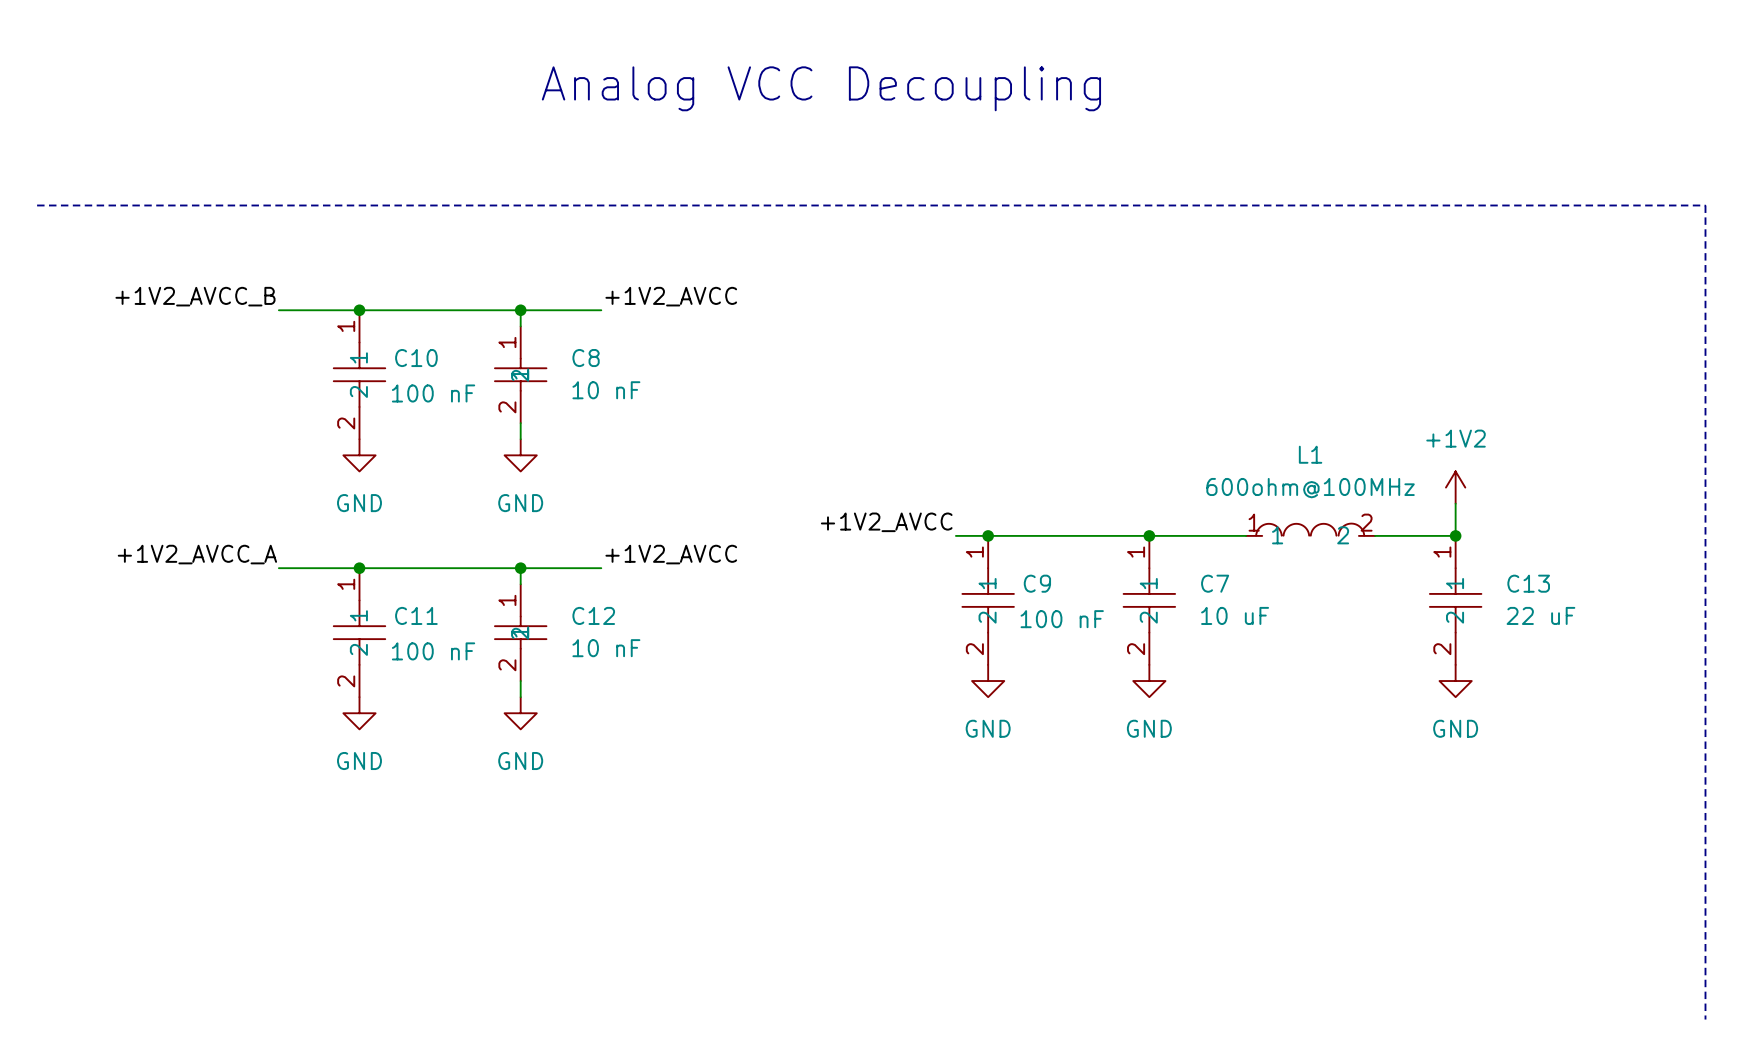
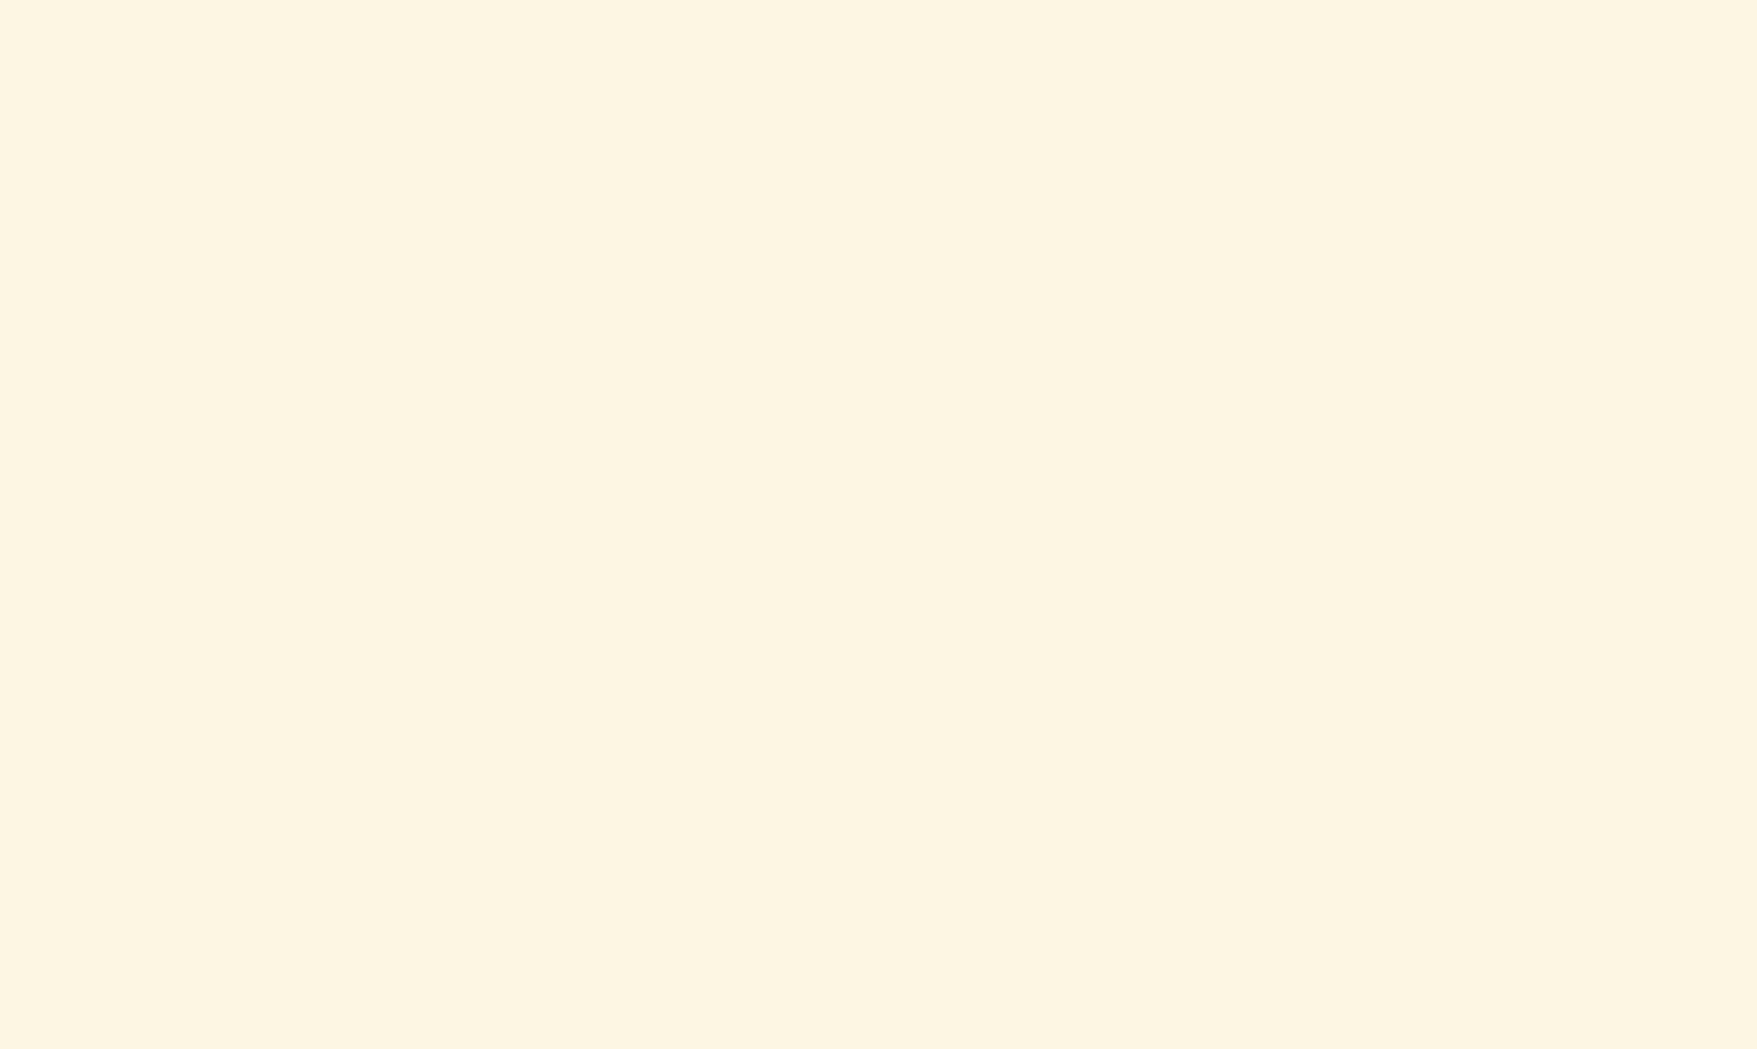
text: Analog VCC Decoupling (821, 88) -> none
line: (37, 205) (1705, 205) (1705, 1019) -> none
label: +1V2_AVCC_B (195, 296) -> none
label: +1V2_AVCC (671, 296) -> none
wire: (278, 310) (601, 310) -> none
junction: (359, 310) -> none
wire: (520, 310) (520, 326) -> none
junction: (520, 310) -> none
C10: 100 nF (359, 374) -> none
C8: 10 nF (520, 374) -> none
wire: (520, 423) (520, 439) -> none
power symbol: GND (359, 455) -> none
power symbol: GND (520, 455) -> none
power symbol: +1V2 (1455, 487) -> none
wire: (1455, 503) (1455, 535) (1375, 535) -> none
label: +1V2_AVCC (886, 522) -> none
L1: 600ohm@100MHz (1310, 529) -> none
wire: (955, 535) (1246, 535) -> none
junction: (988, 535) -> none
junction: (1149, 535) -> none
junction: (1455, 535) -> none
label: +1V2_AVCC_A (197, 554) -> none
label: +1V2_AVCC (671, 554) -> none
wire: (278, 568) (601, 568) -> none
junction: (359, 568) -> none
wire: (520, 568) (520, 584) -> none
junction: (520, 568) -> none
C9: 100 nF (988, 600) -> none
C7: 10 uF (1149, 600) -> none
C13: 22 uF (1455, 600) -> none
C11: 100 nF (359, 632) -> none
C12: 10 nF (520, 632) -> none
wire: (520, 681) (520, 697) -> none
power symbol: GND (988, 681) -> none
power symbol: GND (1149, 681) -> none
power symbol: GND (1455, 681) -> none
power symbol: GND (359, 713) -> none
power symbol: GND (520, 713) -> none

